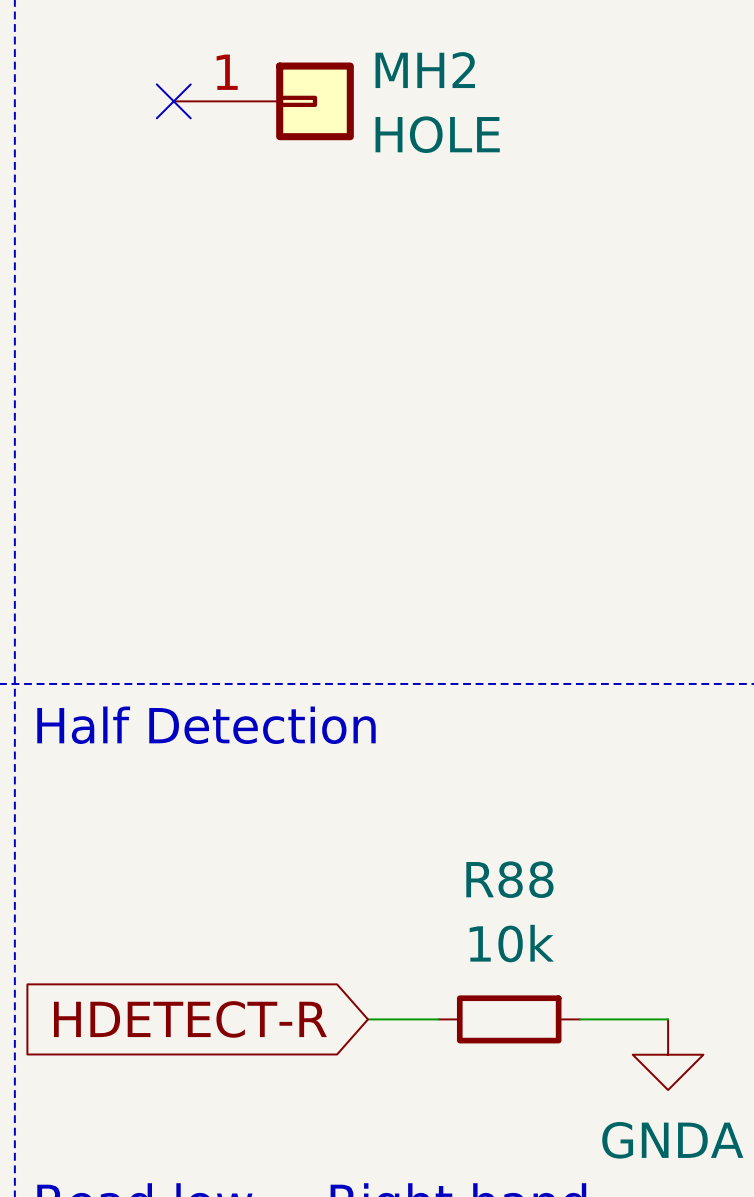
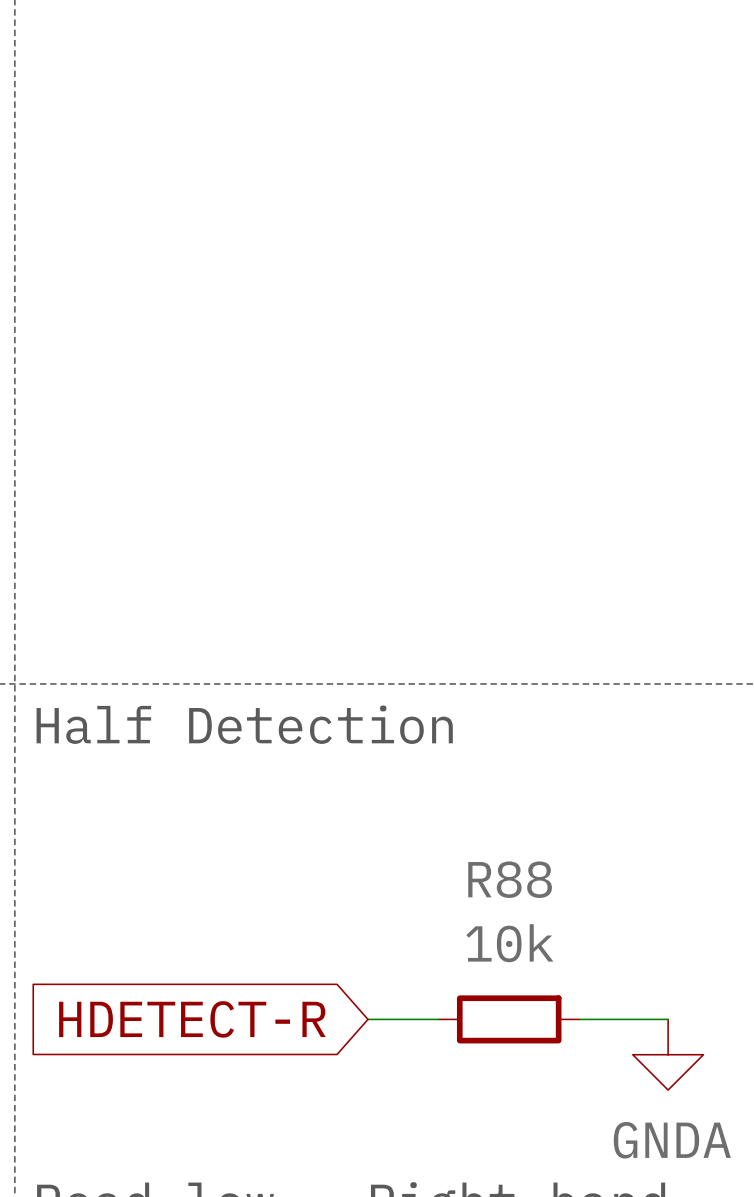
no-connect mark: (173, 101) -> none
MH2: HOLE (263, 101) -> none

